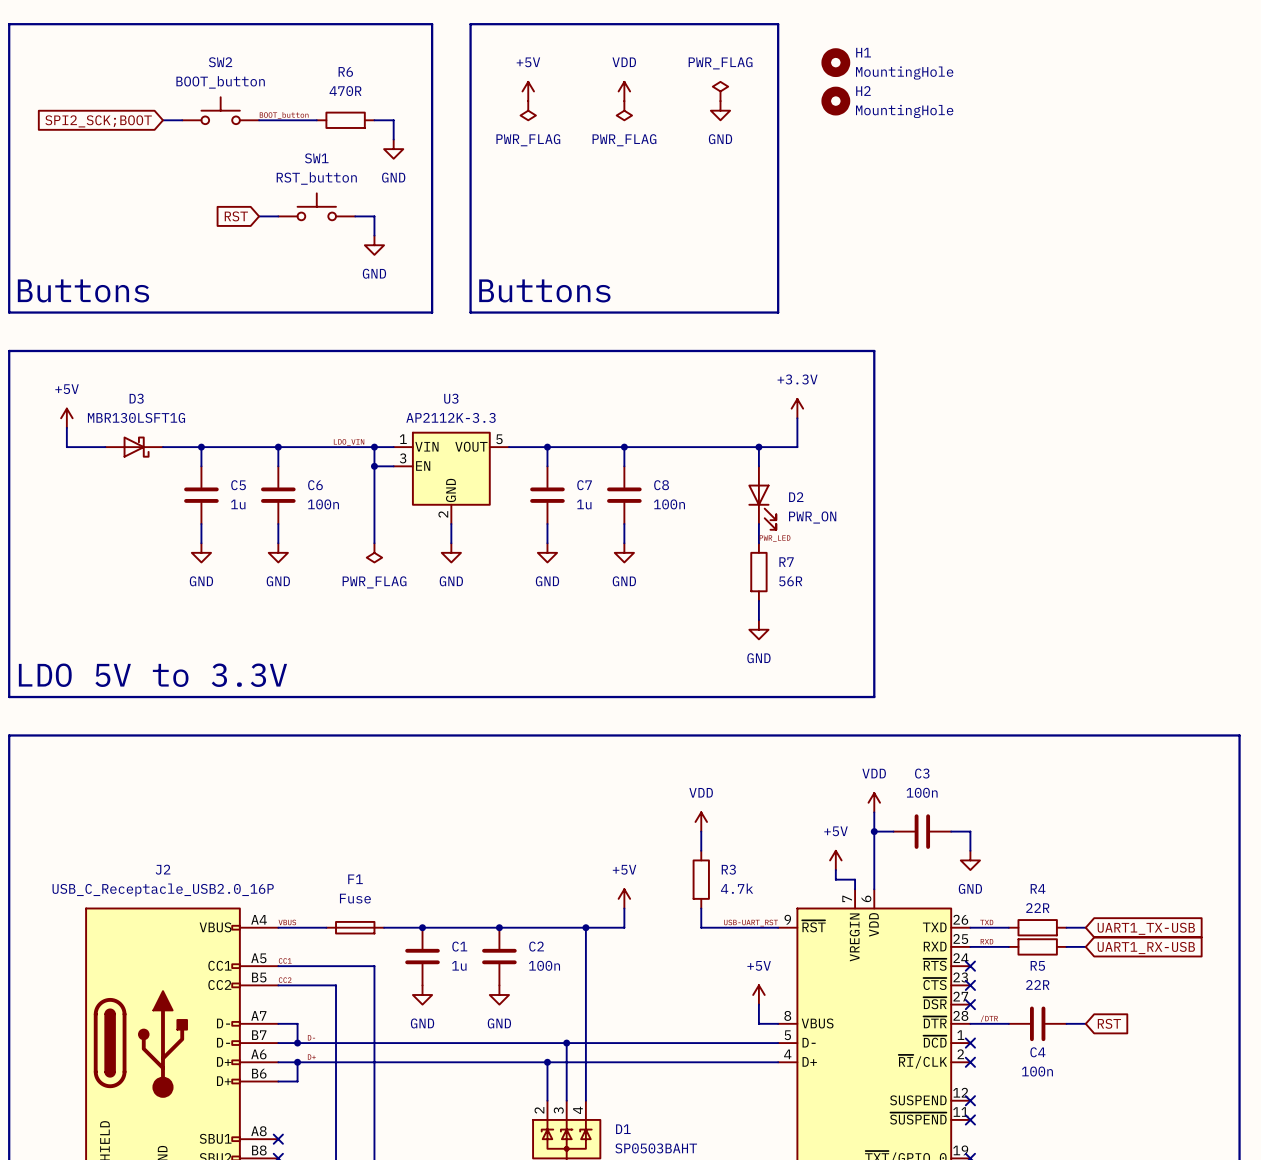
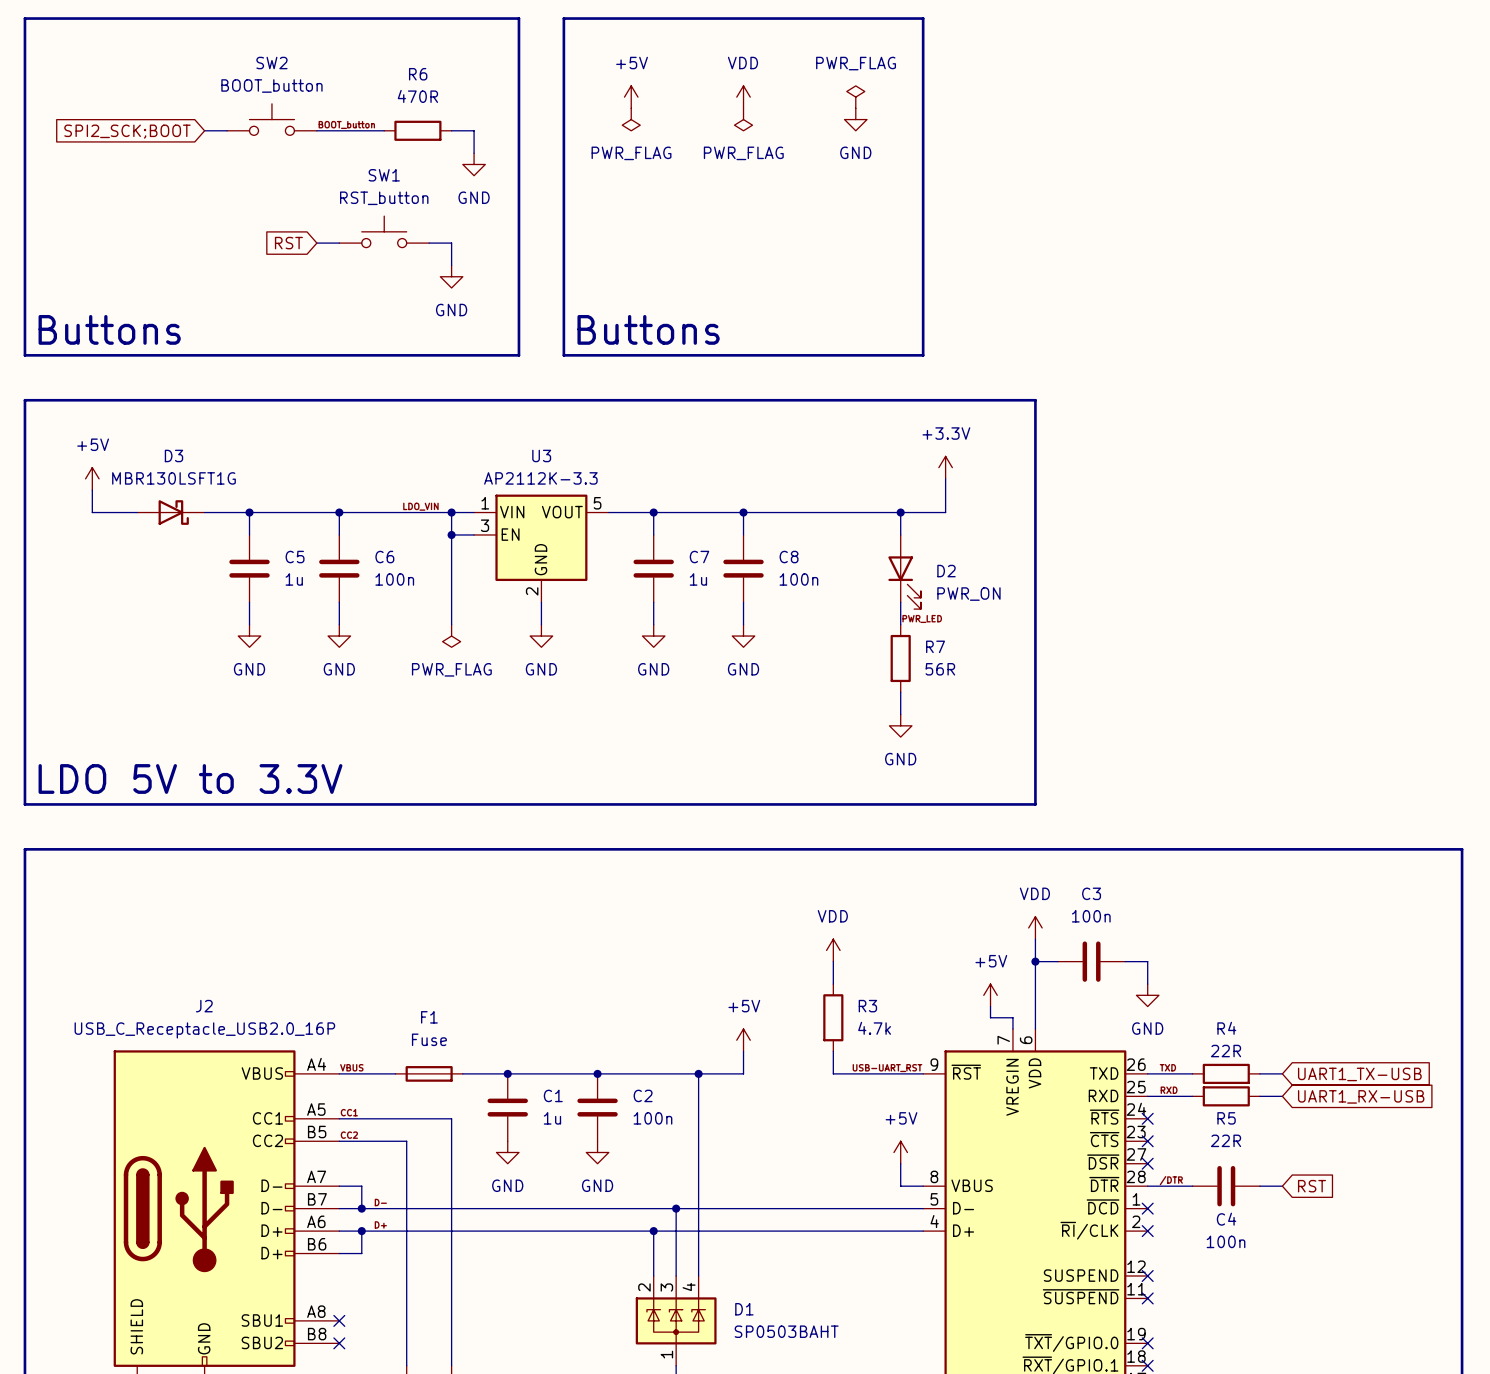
H1: MountingHole (835, 62) -> none
H2: MountingHole (835, 101) -> none

